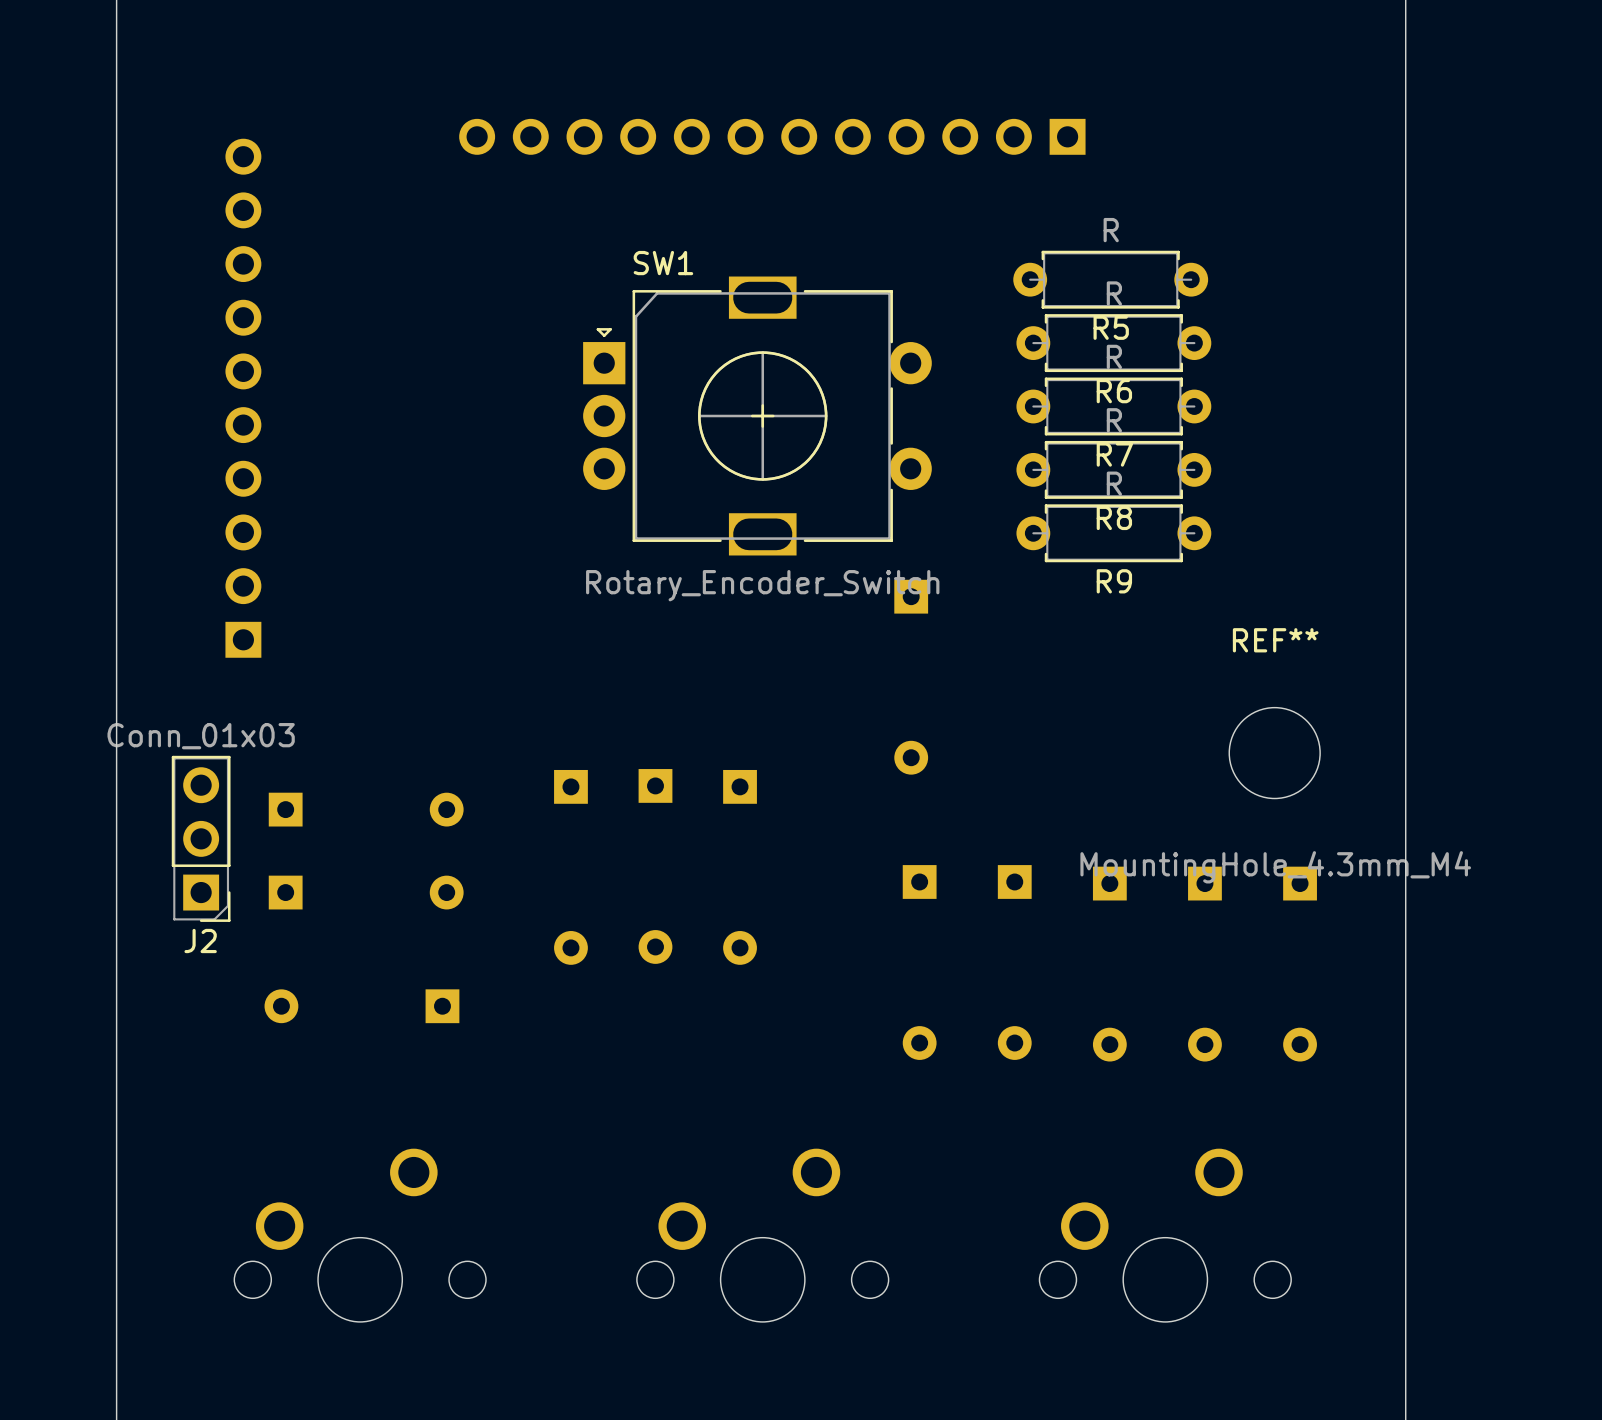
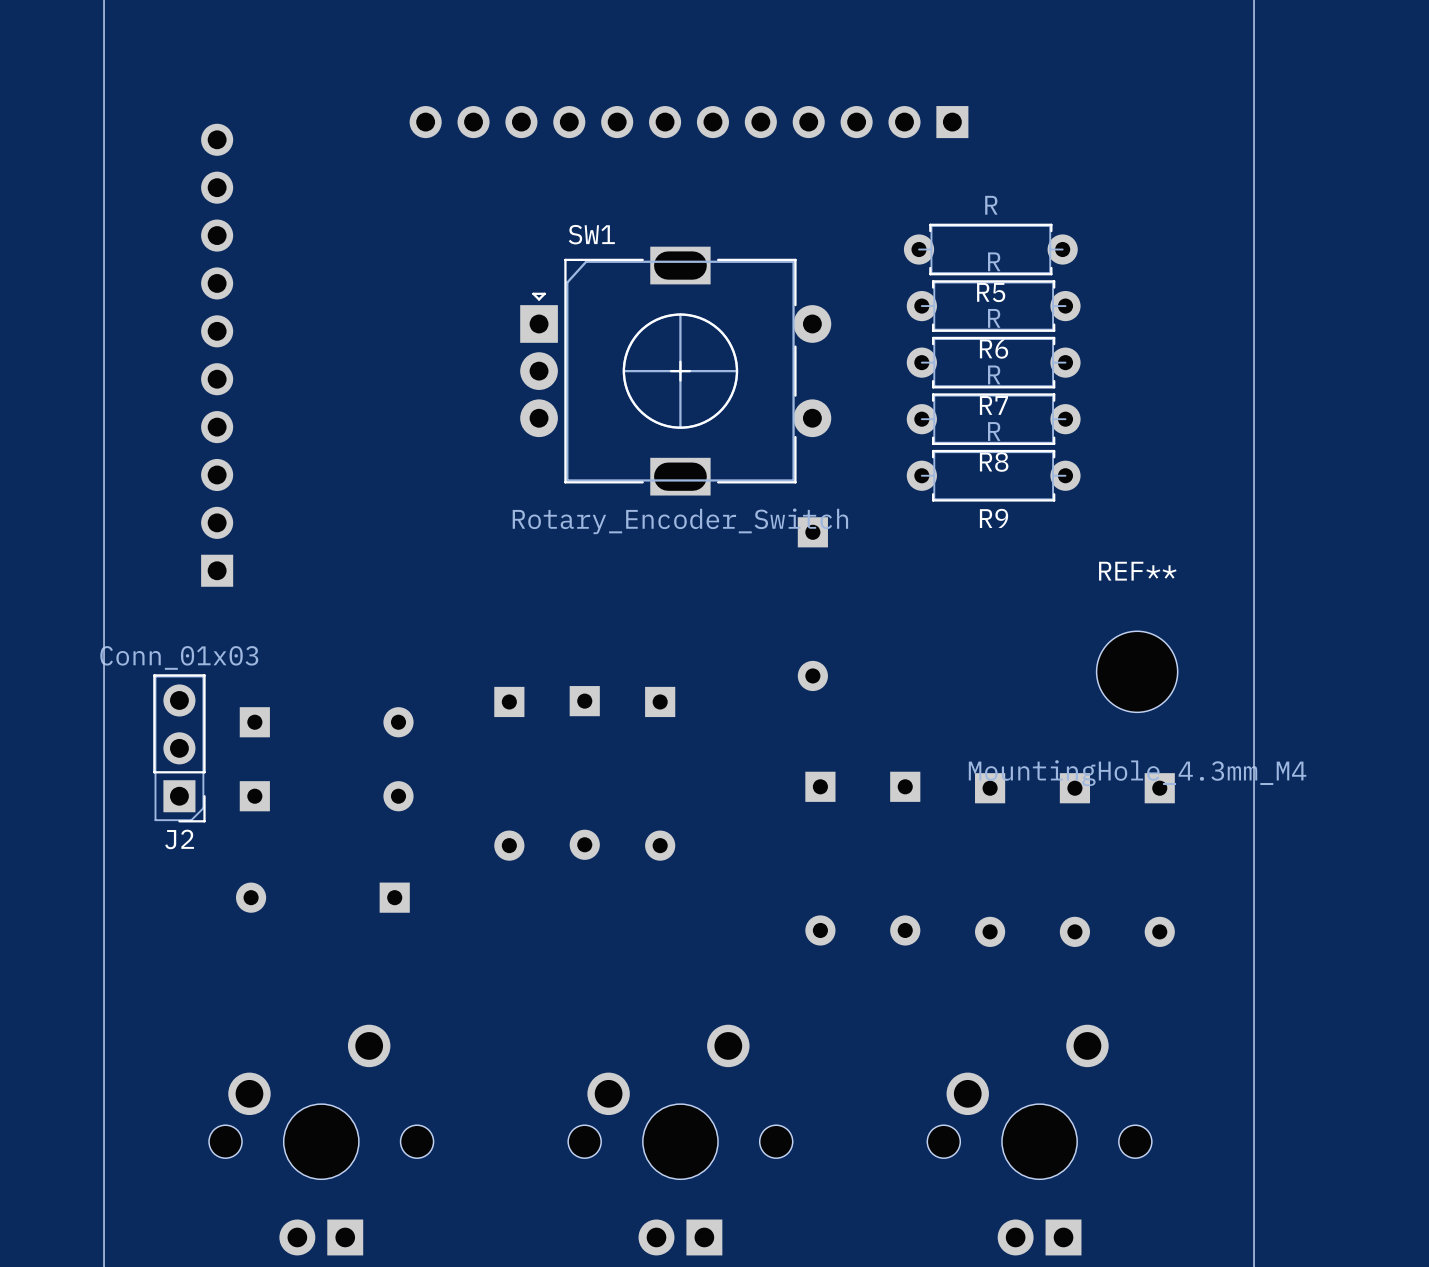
part: none -> (321, 1140)
part: none -> (680, 1140)
part: none -> (1039, 1140)

